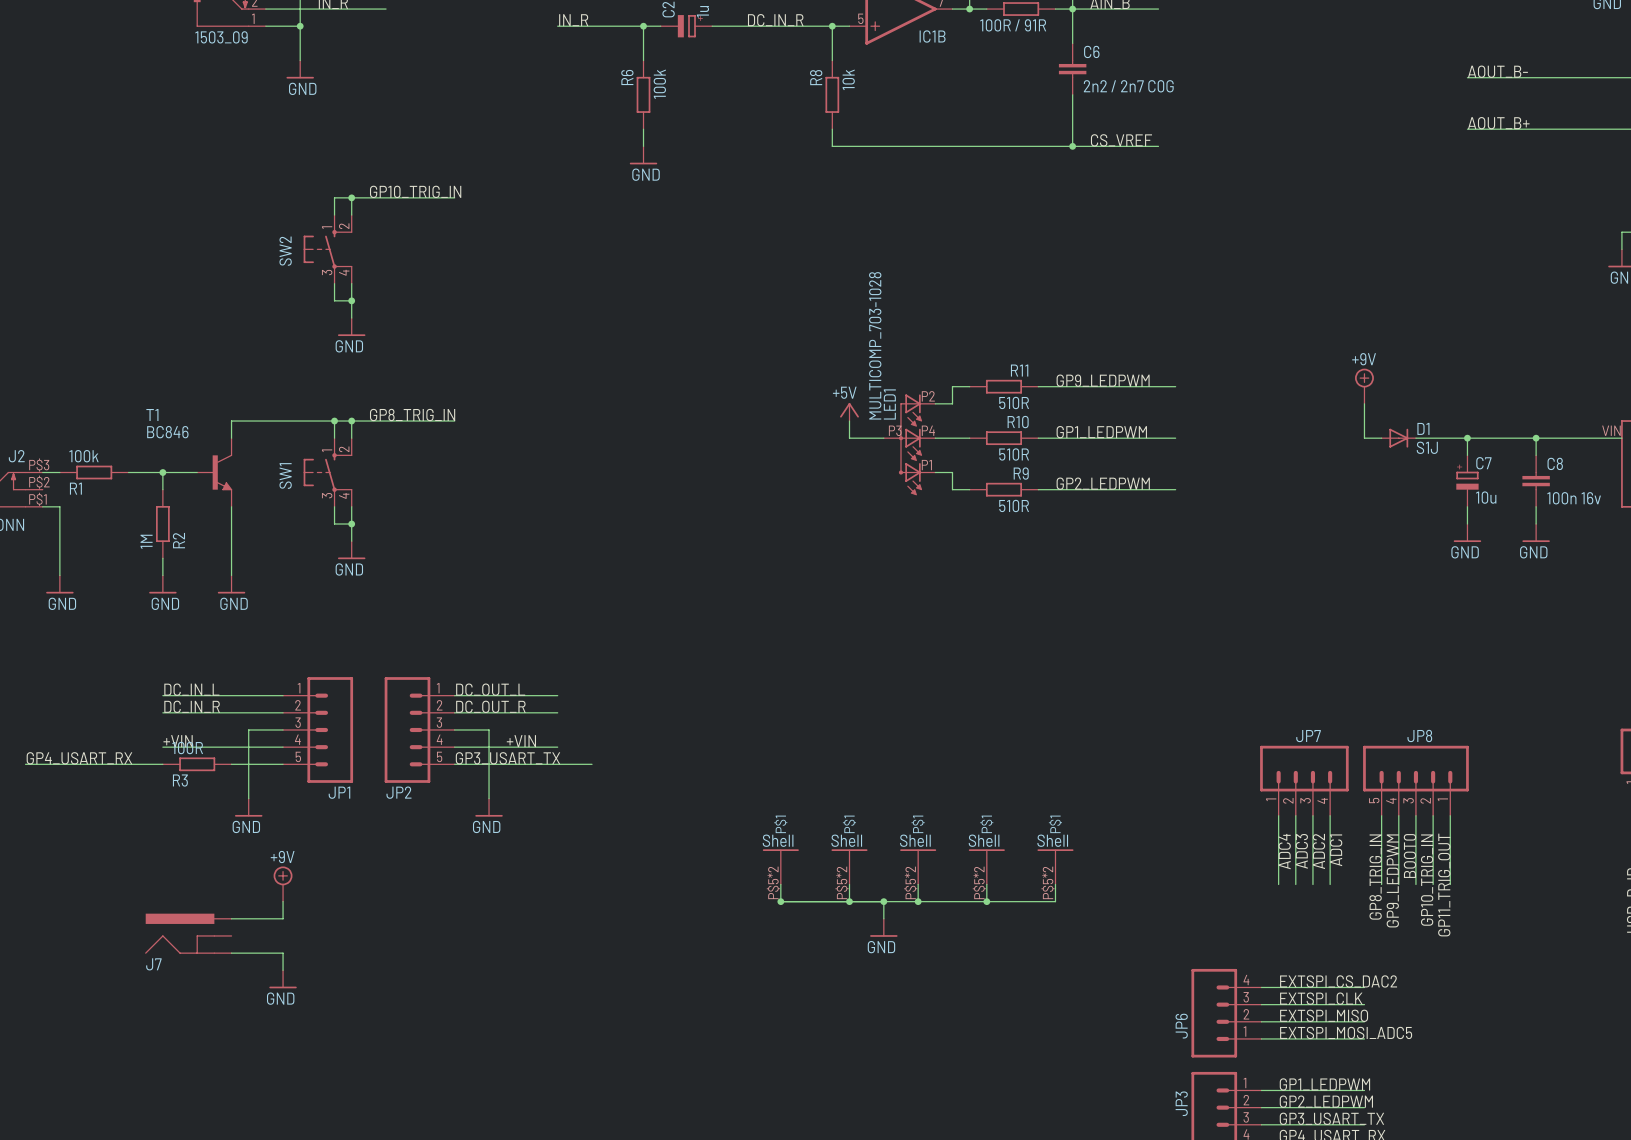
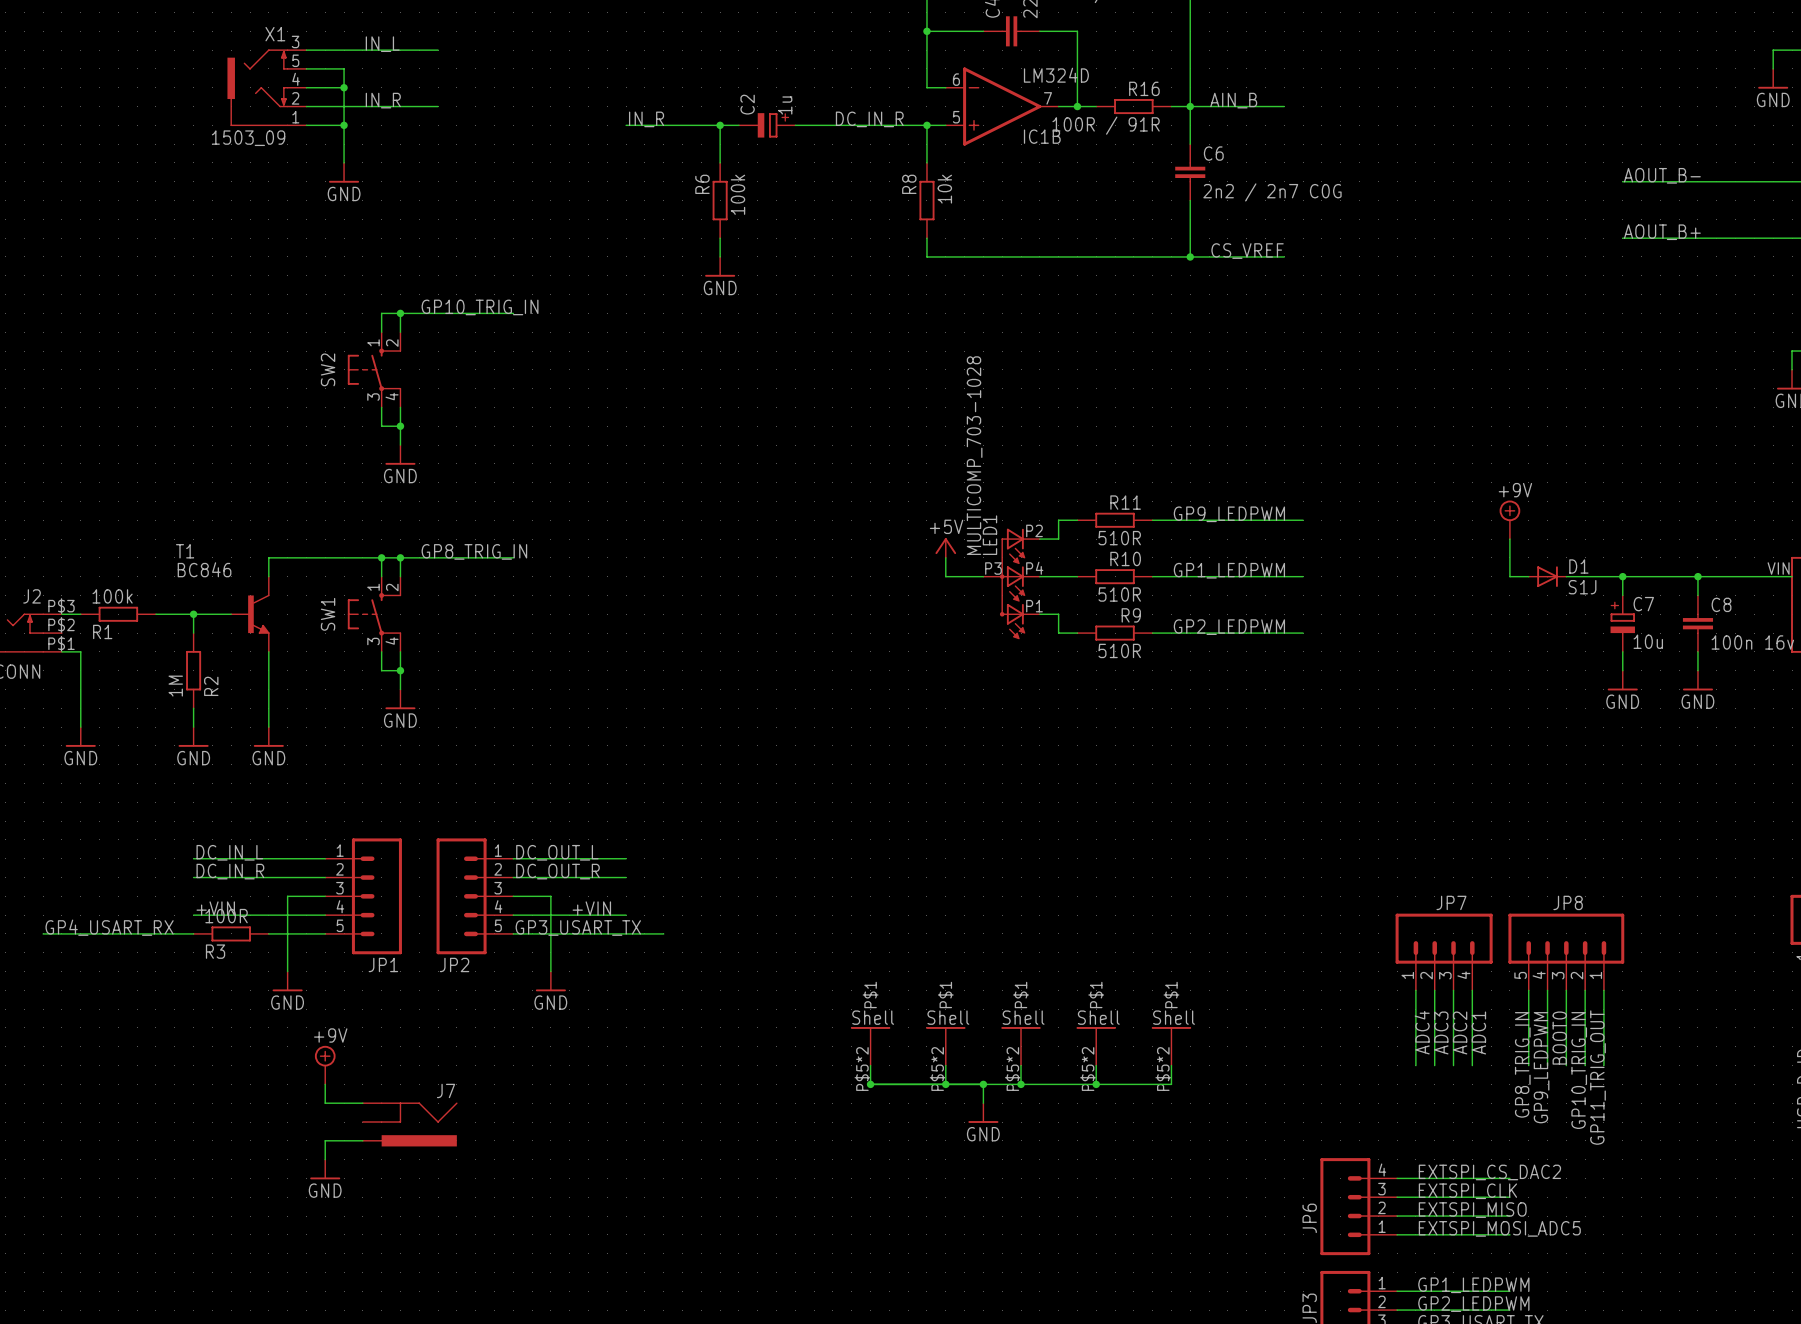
wire: (231, 918) (283, 918) -> (362, 1103) (325, 1103)
J7 rotation: 0° (180, 933) -> 180° (419, 1124)
J7 position: (188, 933) -> (410, 1124)
wire: (231, 953) (283, 953) -> (362, 1140) (325, 1140)

